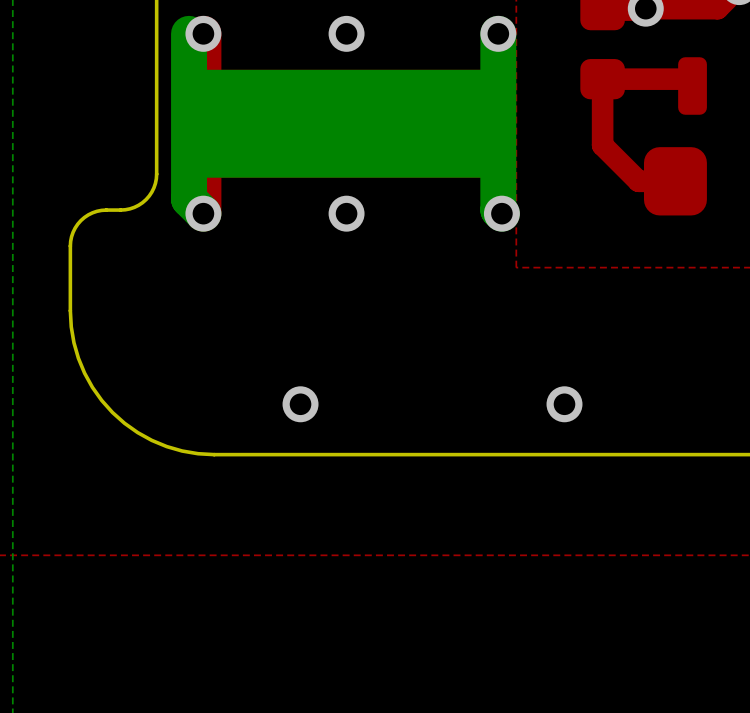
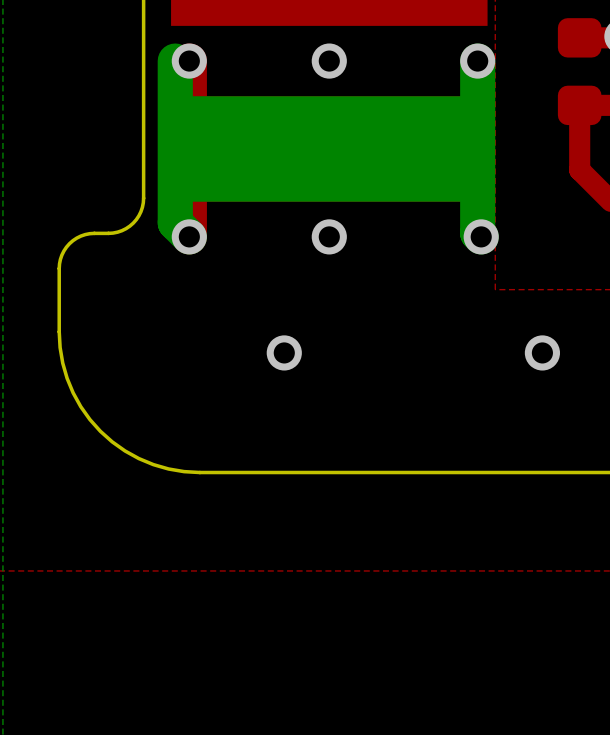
via position: (300, 404) -> (284, 352)
via position: (564, 404) -> (542, 352)

